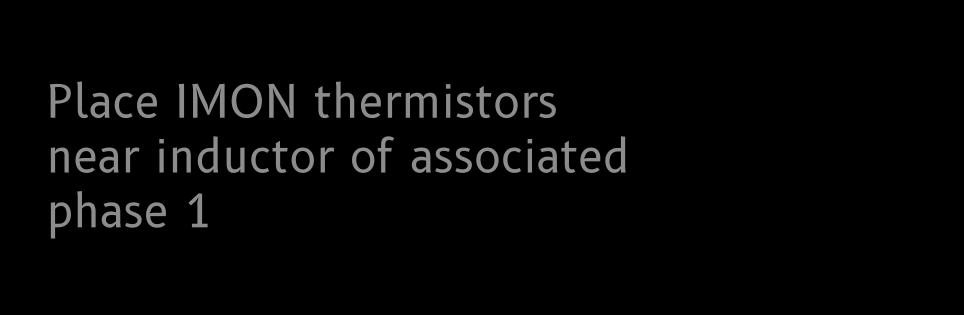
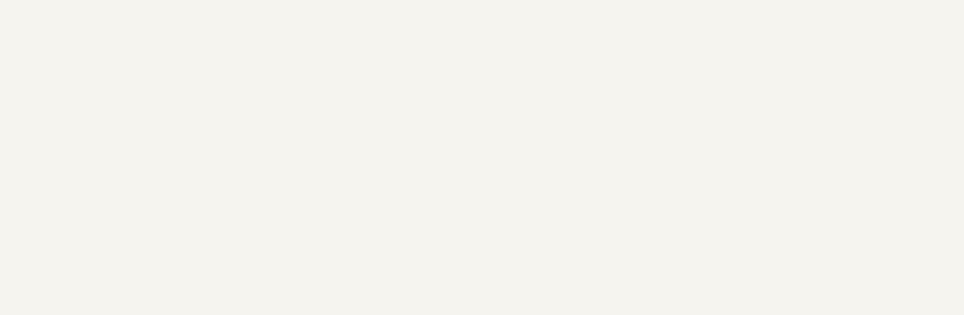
text: Place IMON thermistors (302, 99) -> none
text: near inductor of associated (338, 154) -> none
text: phase 1 (129, 214) -> none

